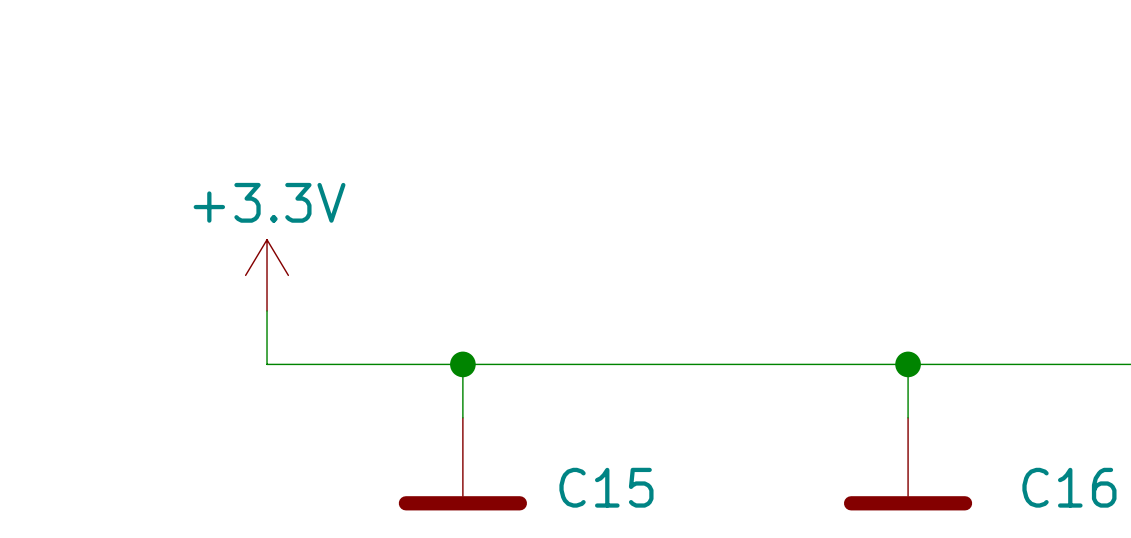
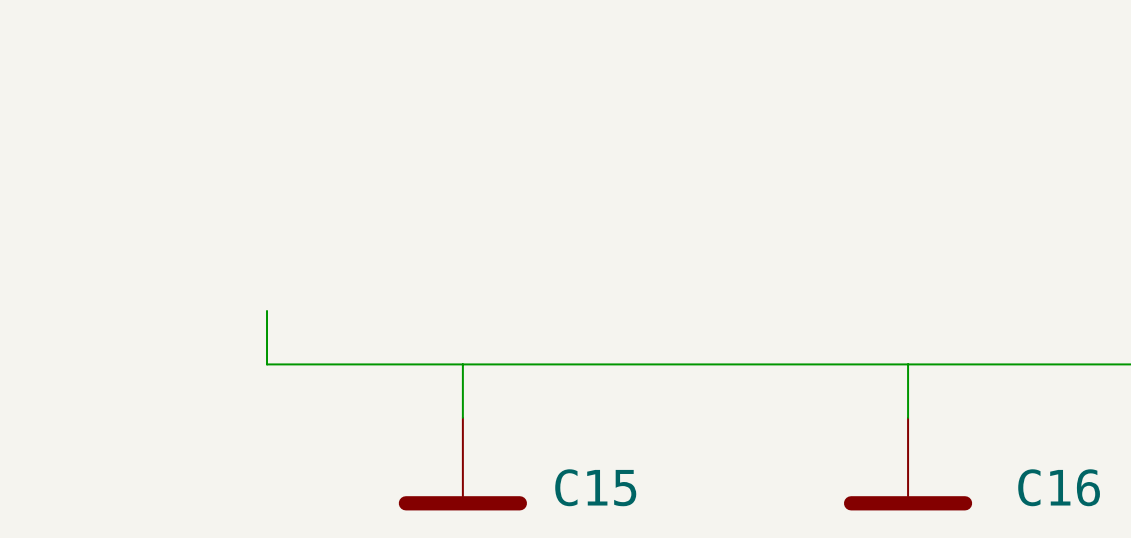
power symbol: +3.3V (267, 275) -> none
junction: (462, 364) -> none
junction: (908, 364) -> none

